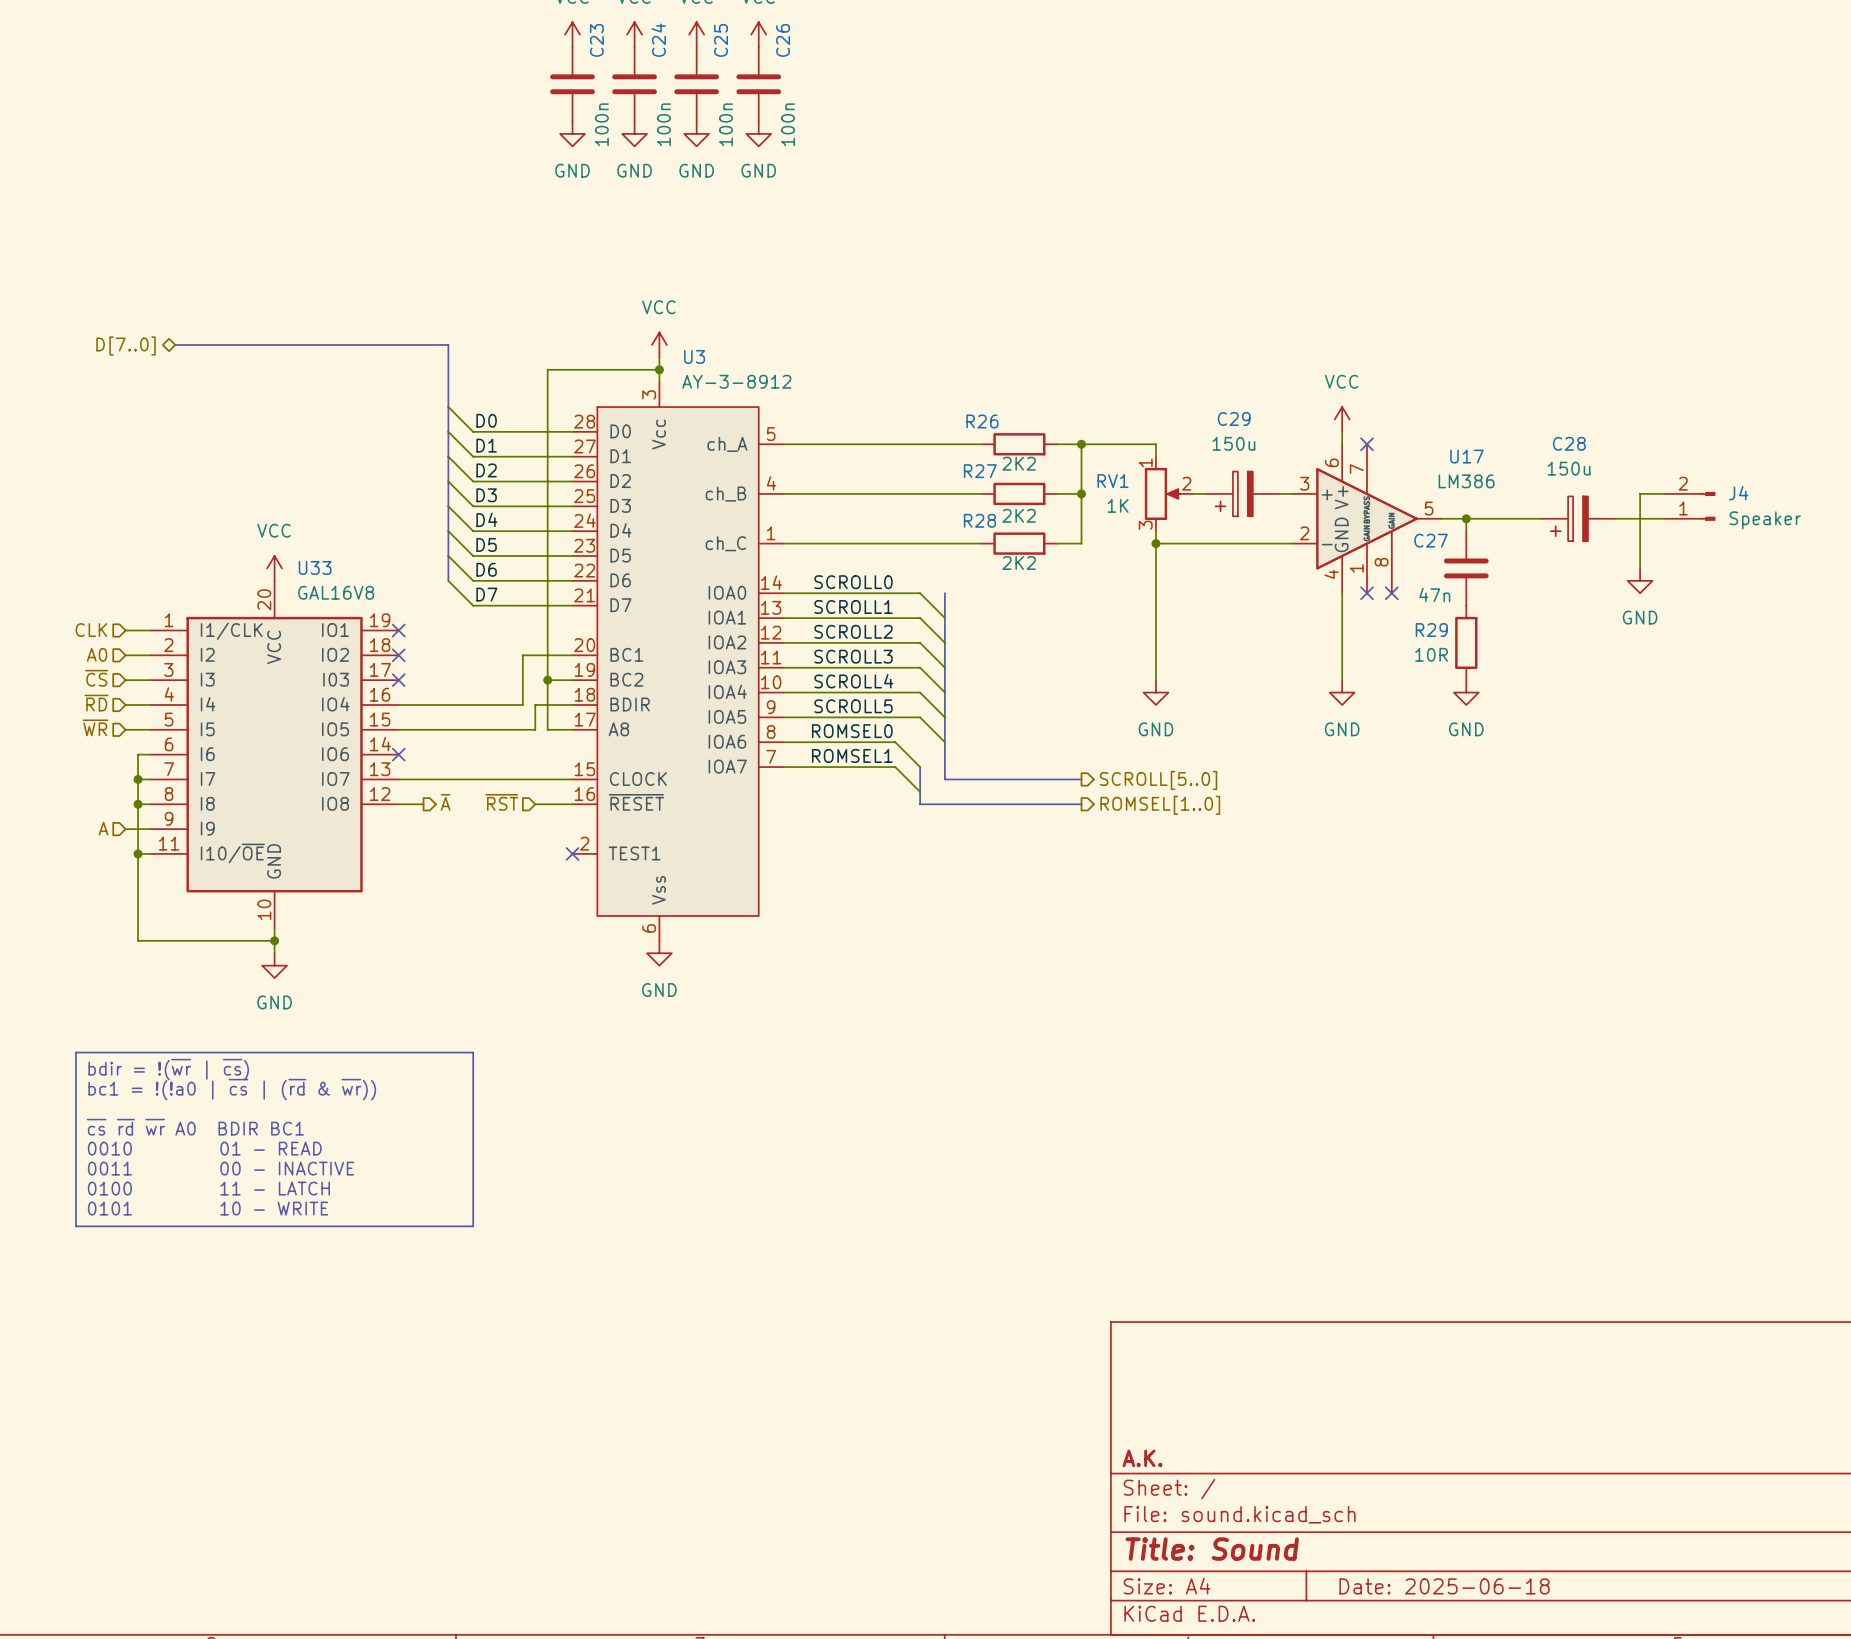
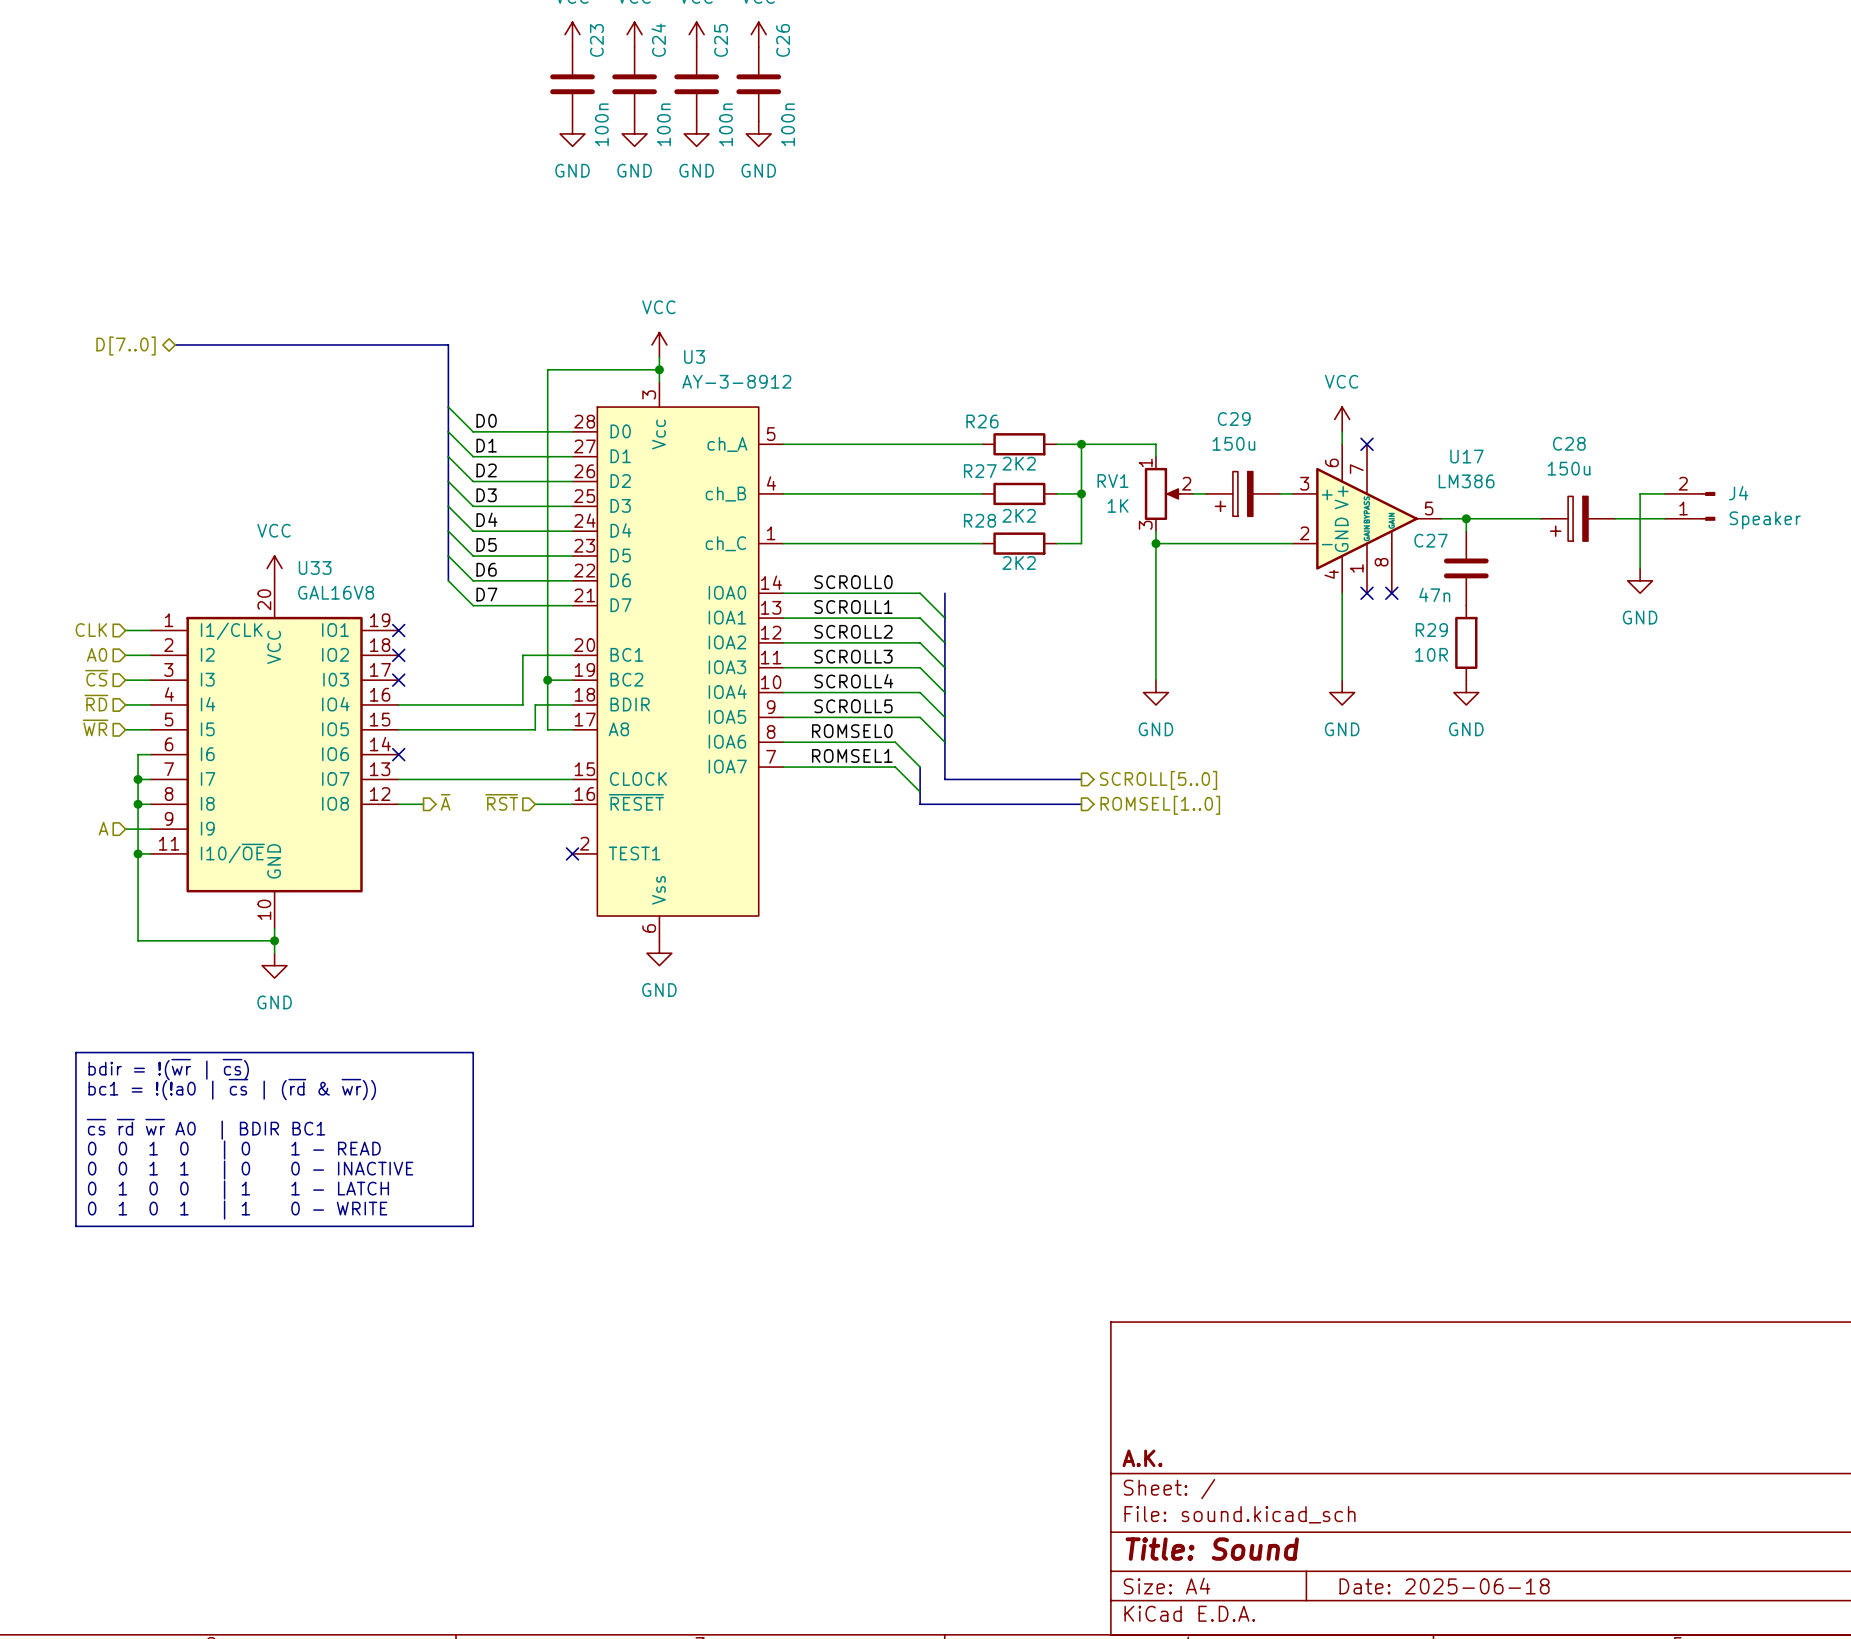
text: ~{cs} ~{rd} ~{wr} A0 BDIR BC1 (195, 1127) -> ~{cs} ~{rd} ~{wr} A0 | BDIR BC1 (205, 1129)
text: 0010 01 - READ (204, 1148) -> 0 0 1 0 | 0 1 - READ (234, 1150)
text: 0011 00 - INACTIVE (221, 1168) -> 0 0 1 1 | 0 0 - INACTIVE (250, 1170)
text: 0100 11 - LATCH (208, 1188) -> 0 1 0 0 | 1 1 - LATCH (238, 1190)
text: 0101 10 - WRITE (208, 1208) -> 0 1 0 1 | 1 0 - WRITE (237, 1210)

